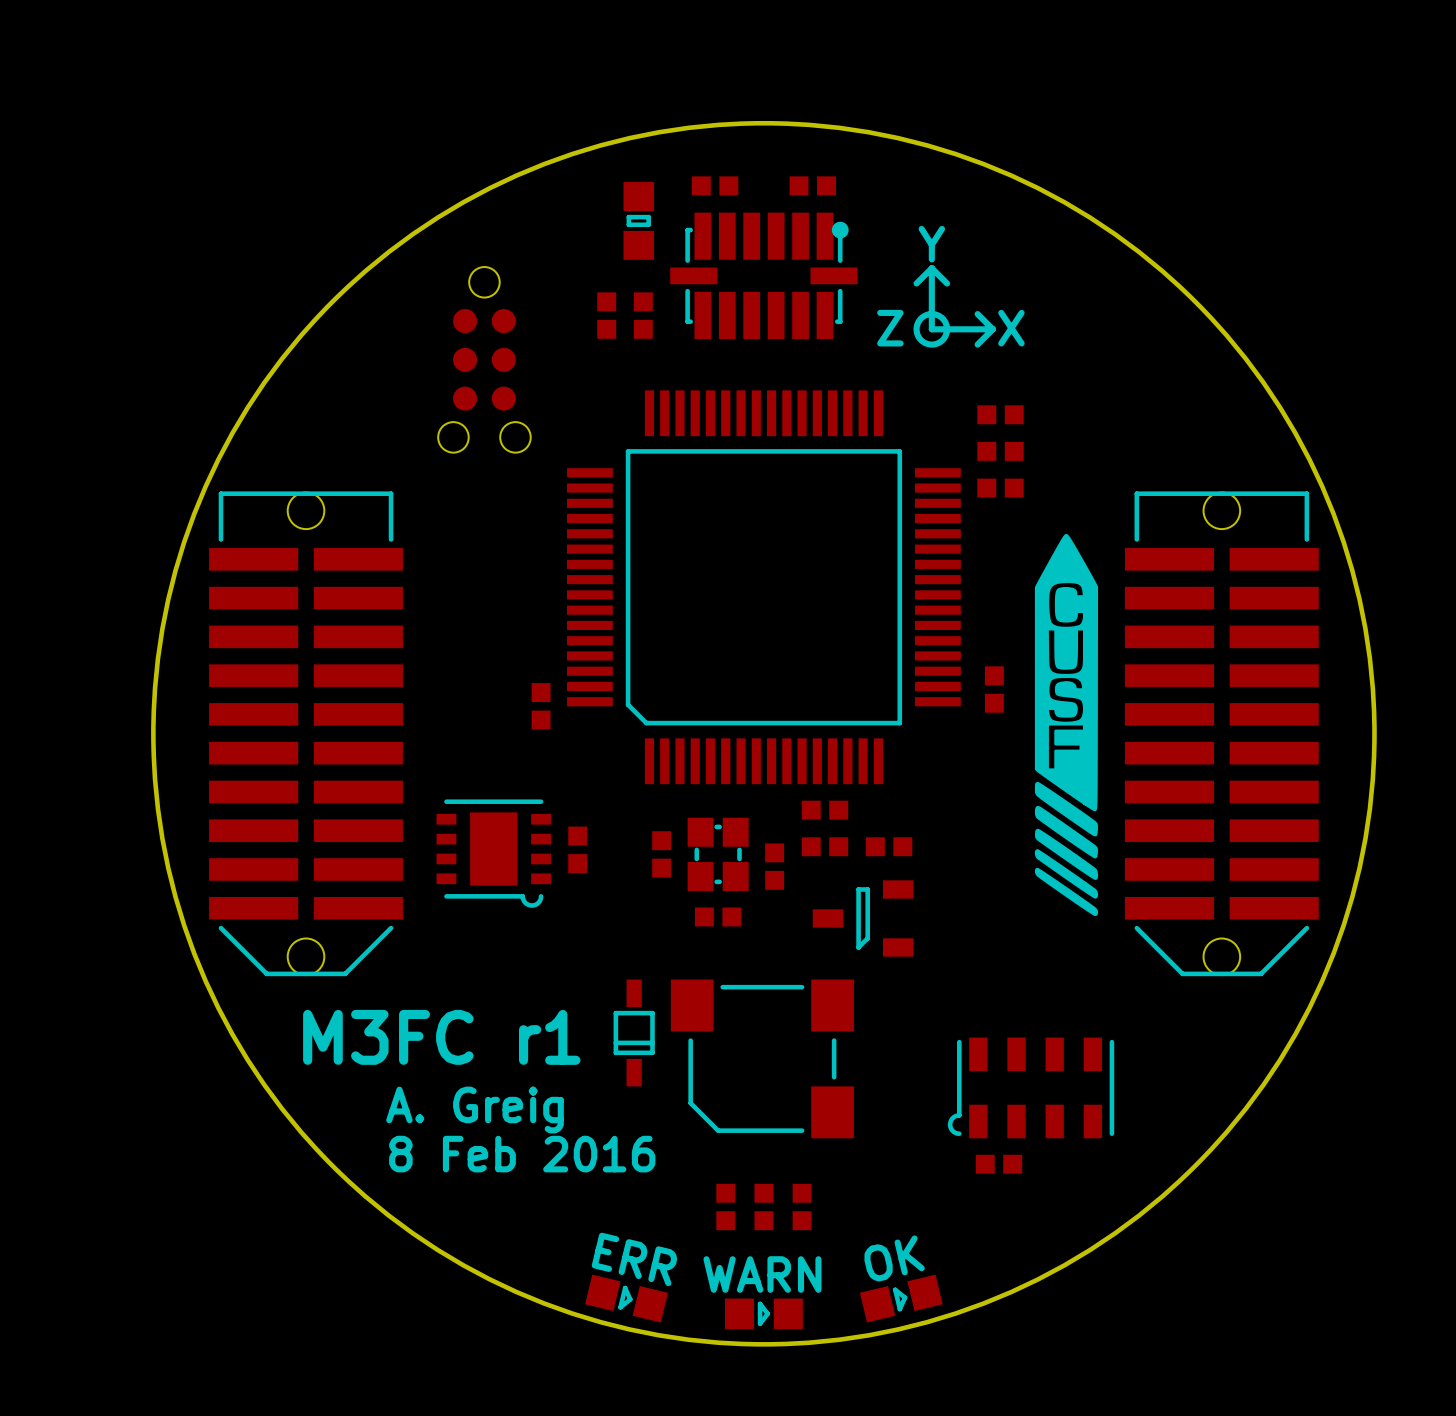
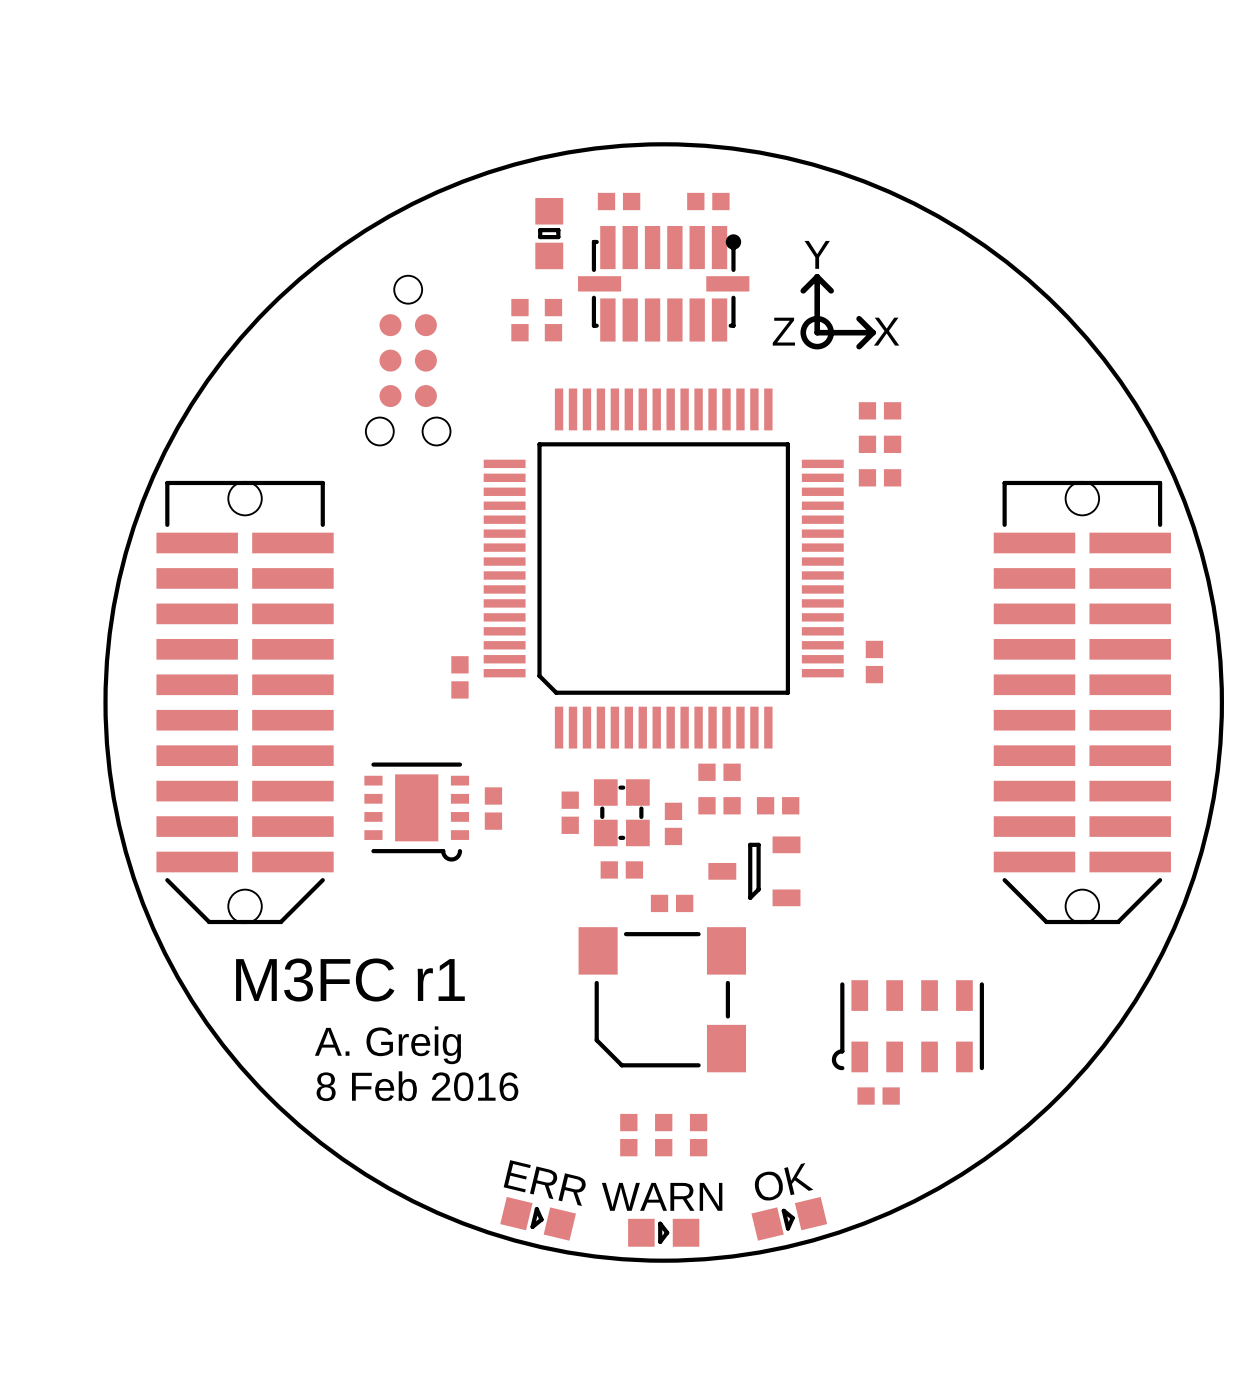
drawing: [1034, 533, 1099, 917] -> none
part: none -> (672, 903)
part: (634, 1032) -> none

